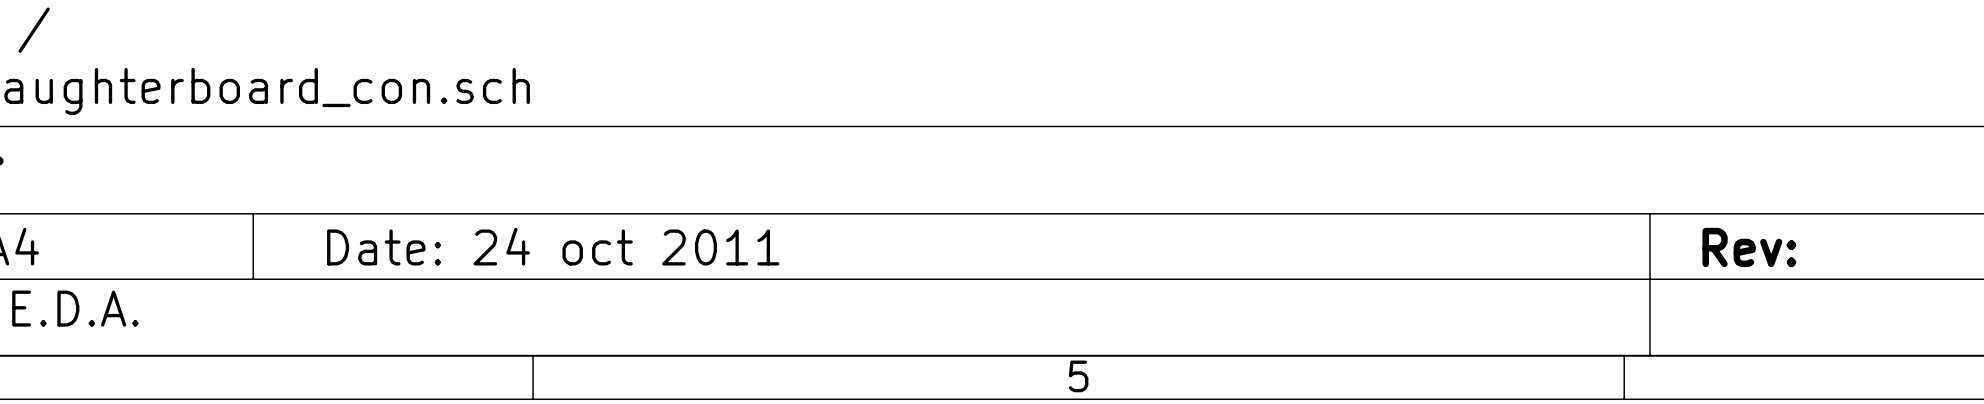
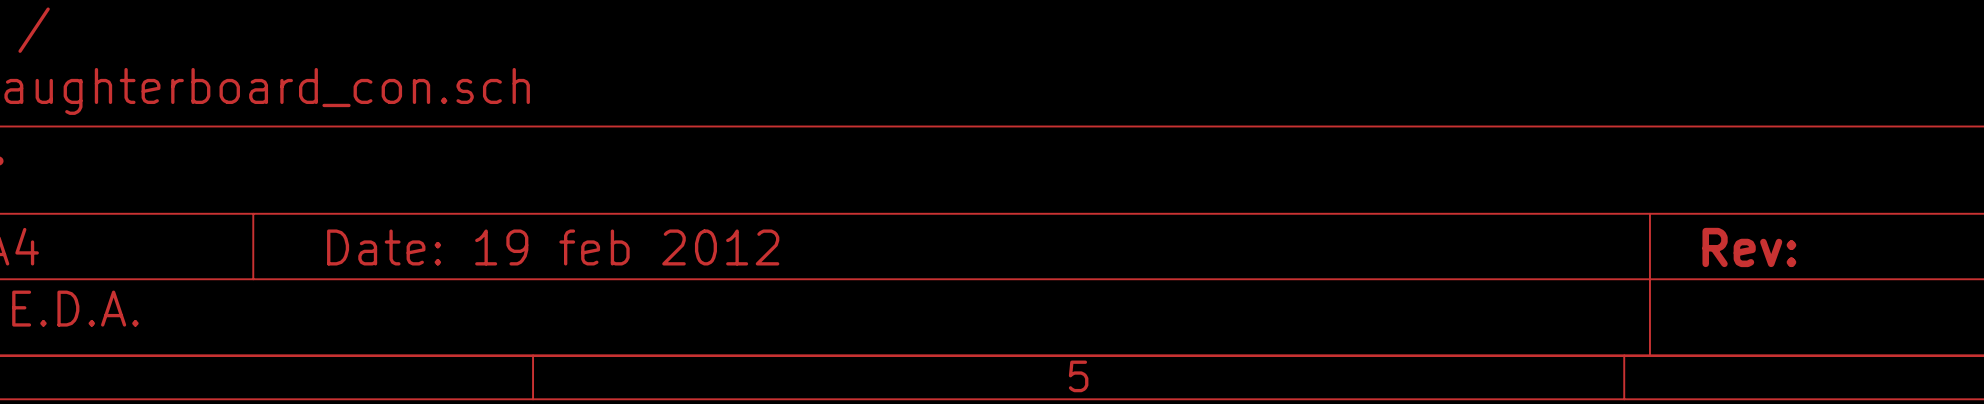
title block: Date: 24 oct 2011 (553, 246) -> Date: 19 feb 2012 (553, 247)

